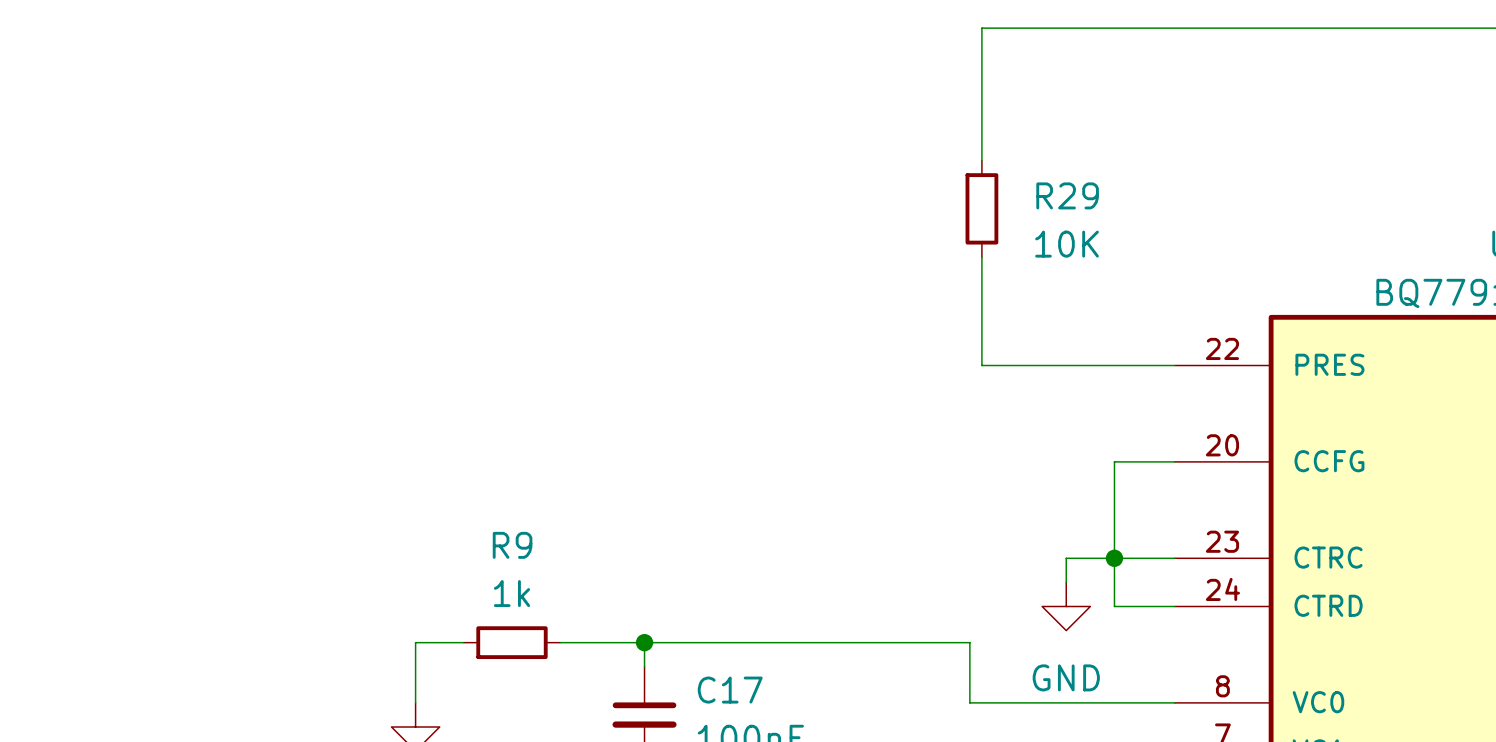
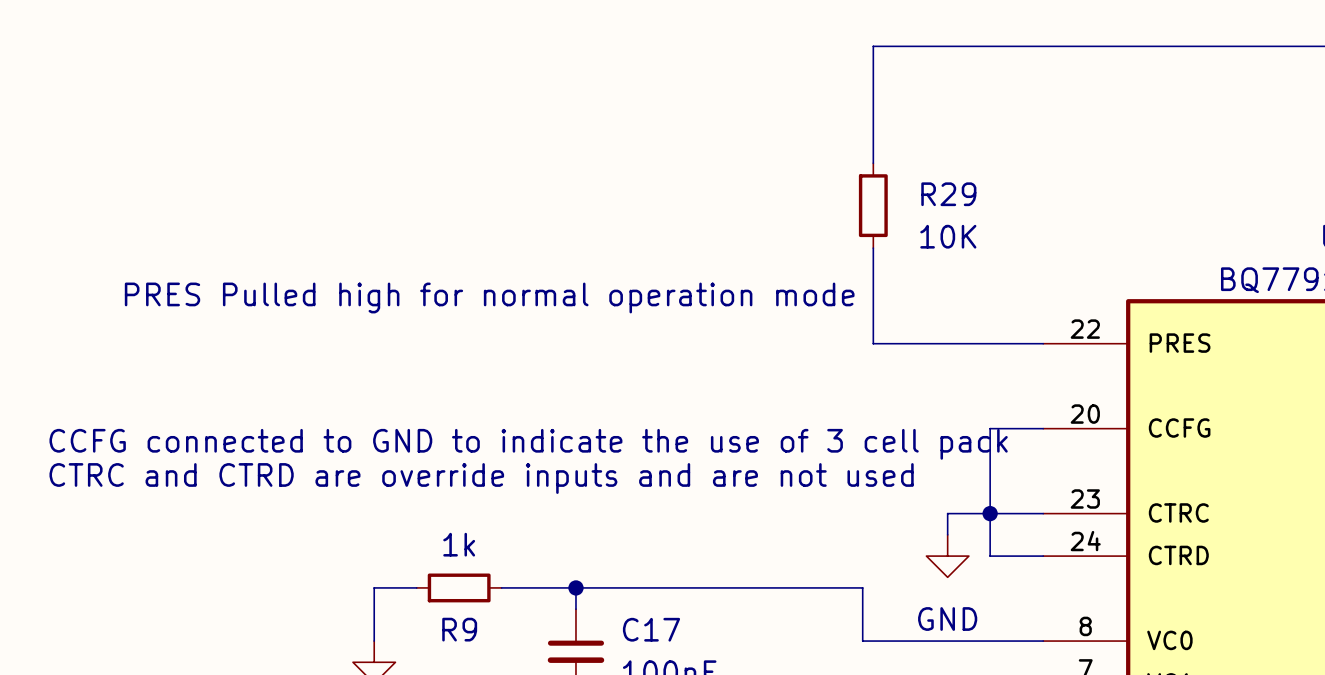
text: none -> PRES Pulled high for normal operation mode (489, 297)
text: none -> CCFG connected to GND to indicate the use of 3 cell pack (528, 444)
text: none -> CTRC and CTRD are override inputs and are not used (481, 478)
R9 name position: R9 (512, 545) -> R9 (459, 629)

